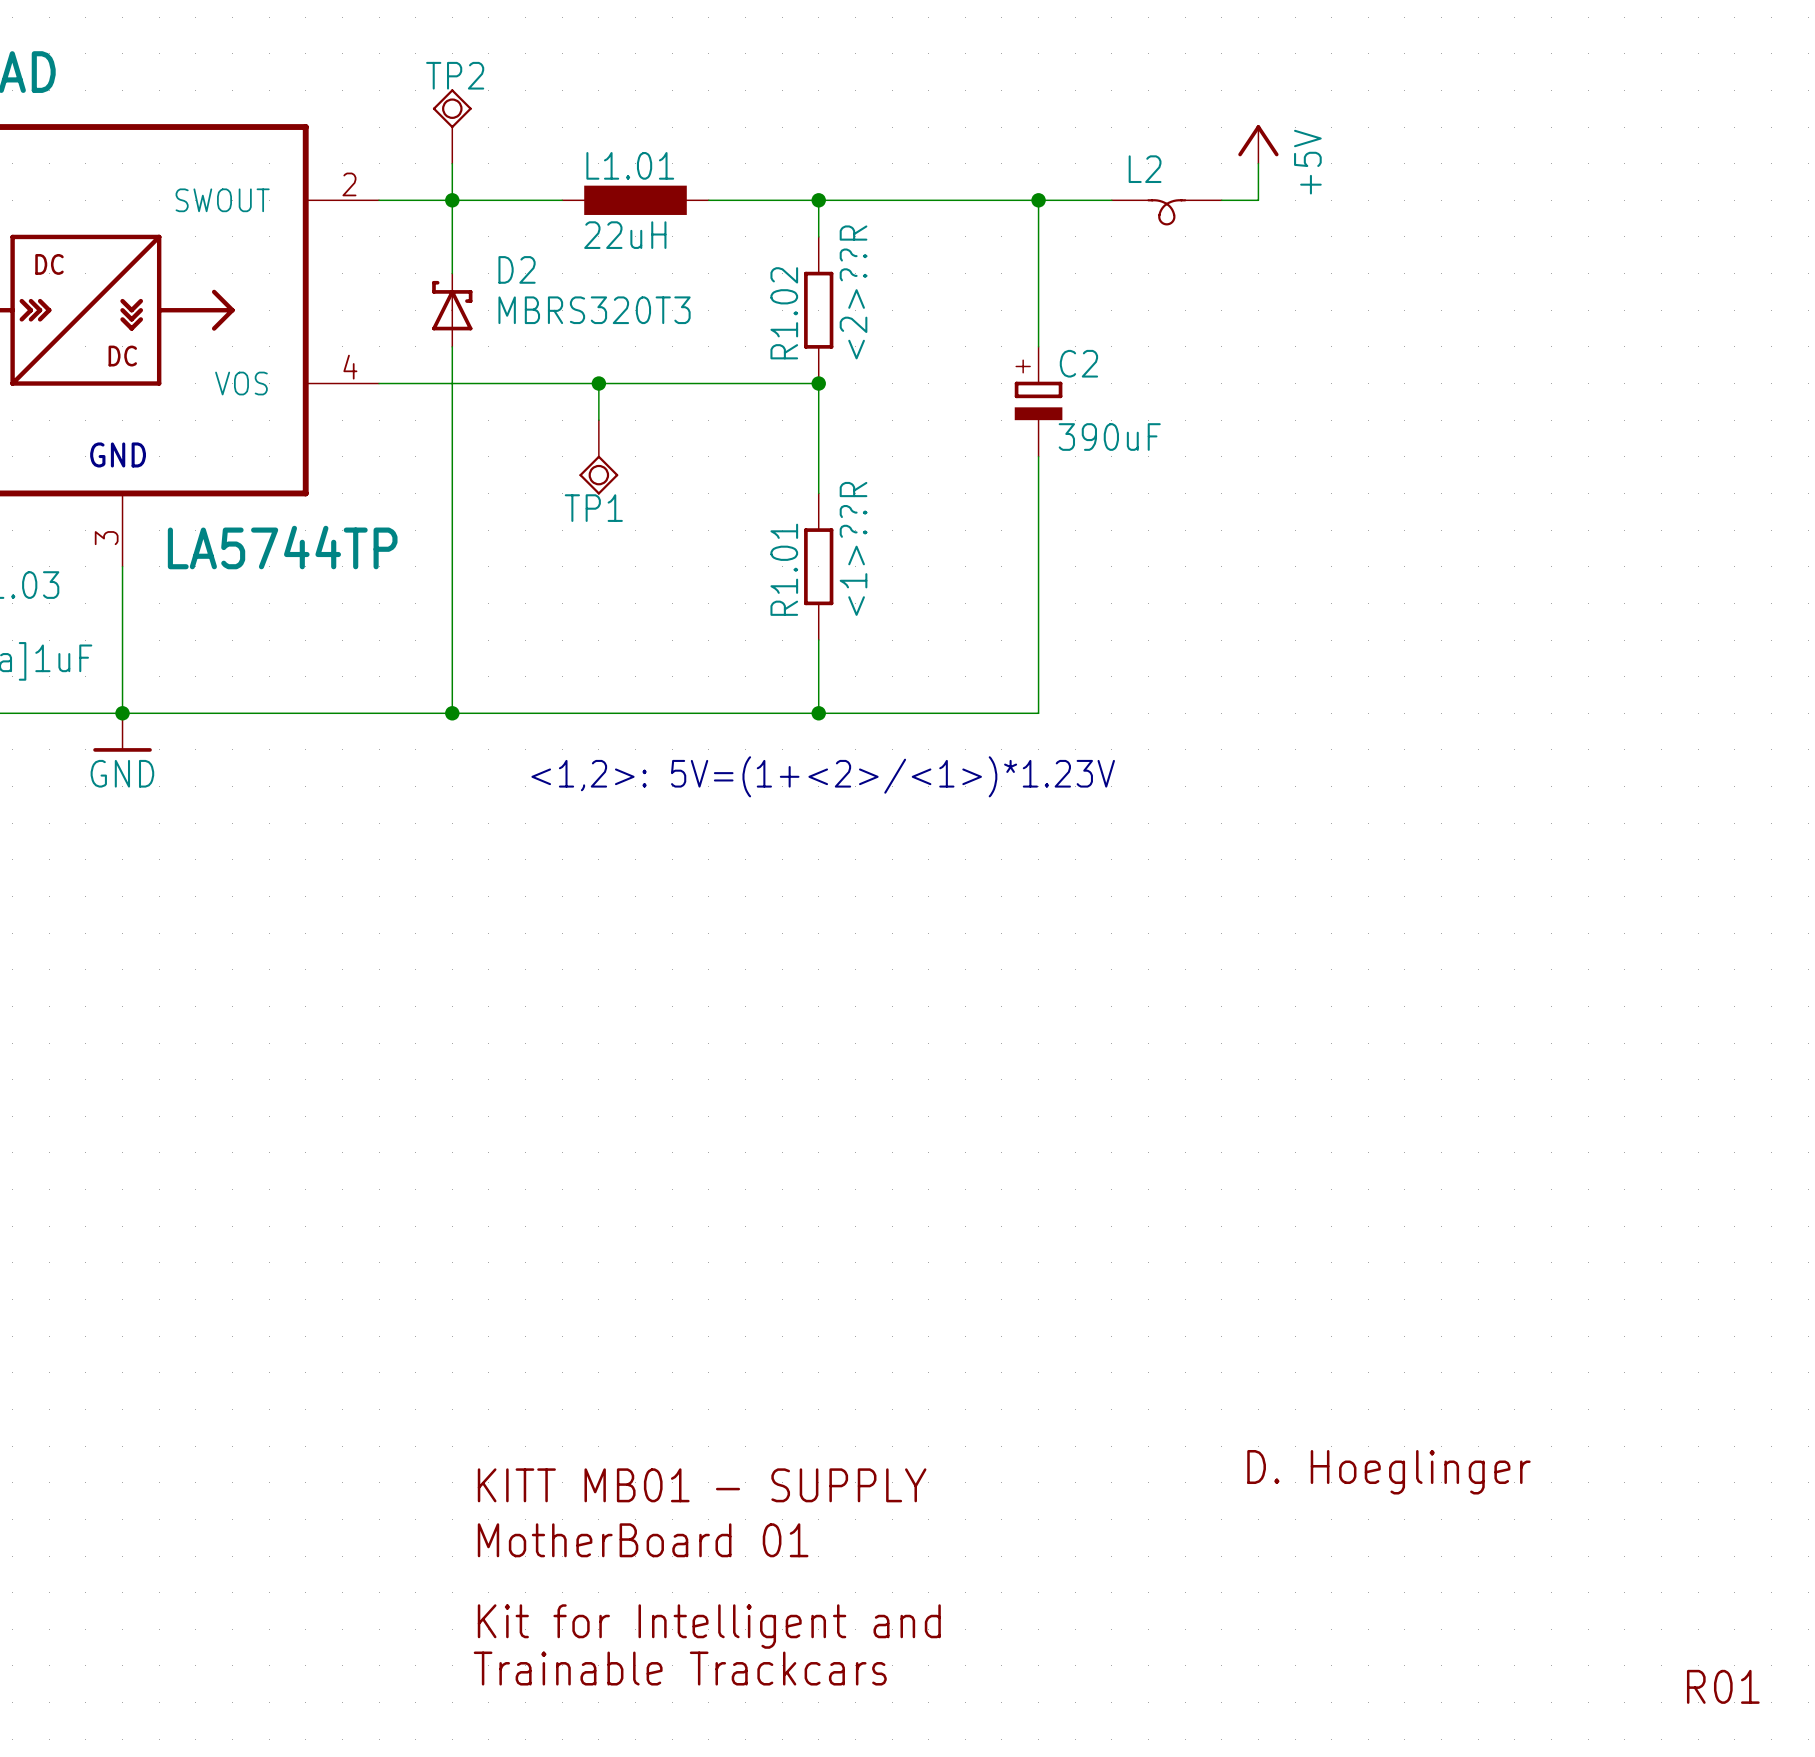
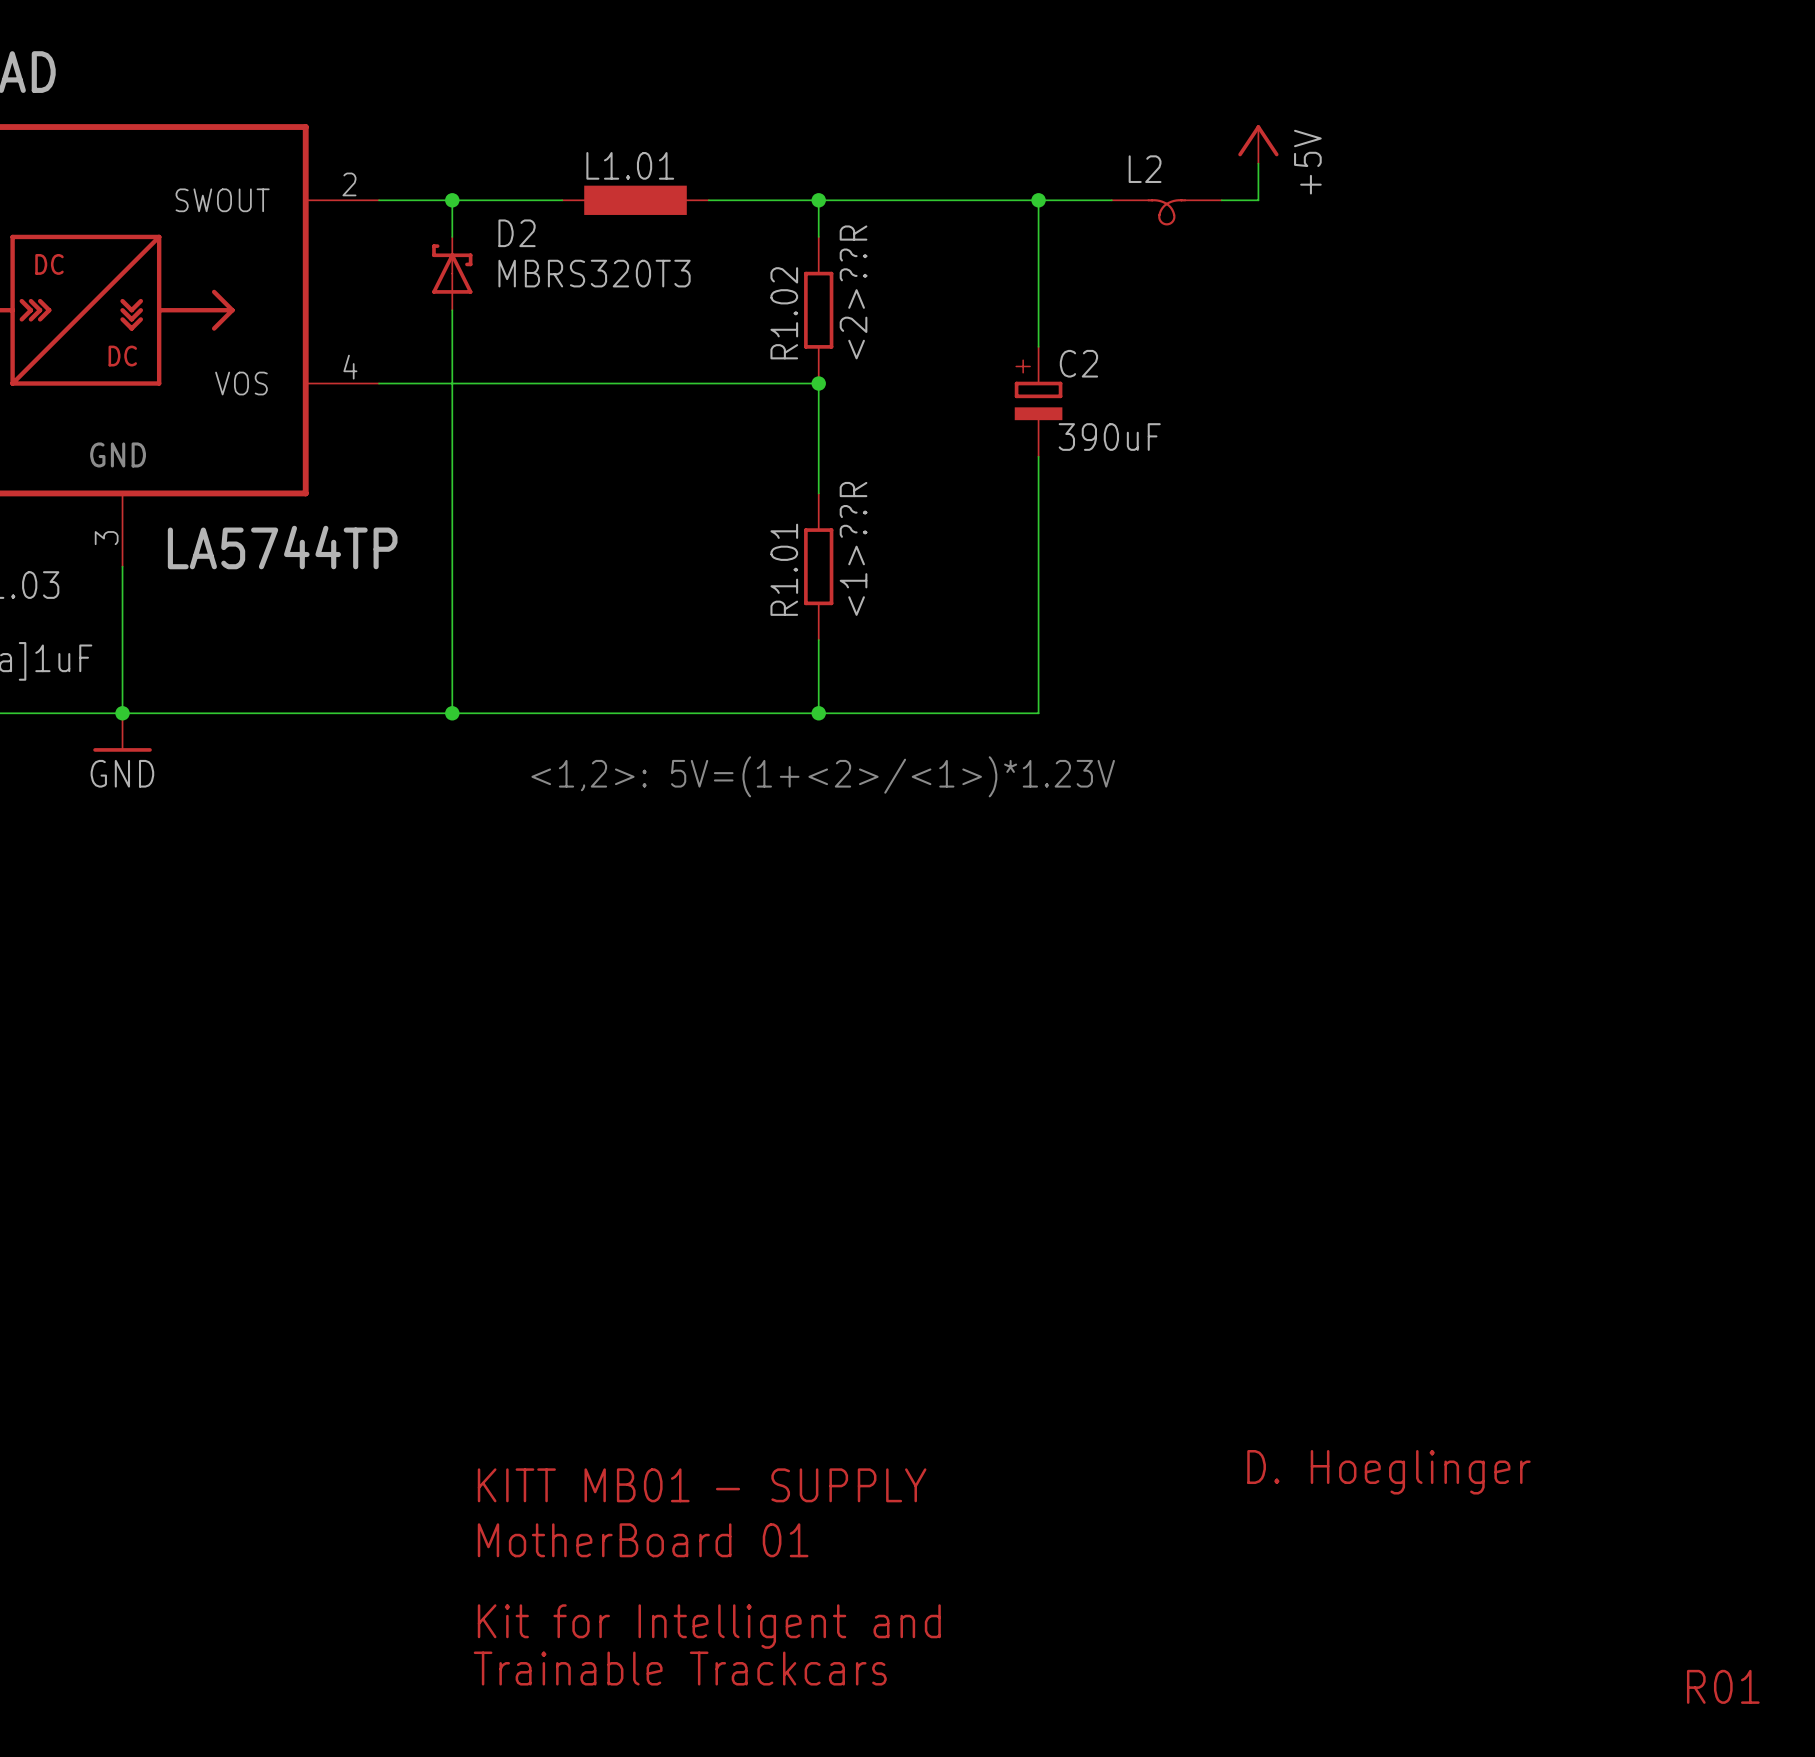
TP2: (452, 126) -> none
wire: (452, 163) (452, 200) -> none
L1.01 value: 22uH (625, 235) -> none
D2 position: (452, 310) -> (452, 273)
wire: (598, 383) (598, 420) -> none
junction: (598, 383) -> none
TP1: (598, 457) -> none

